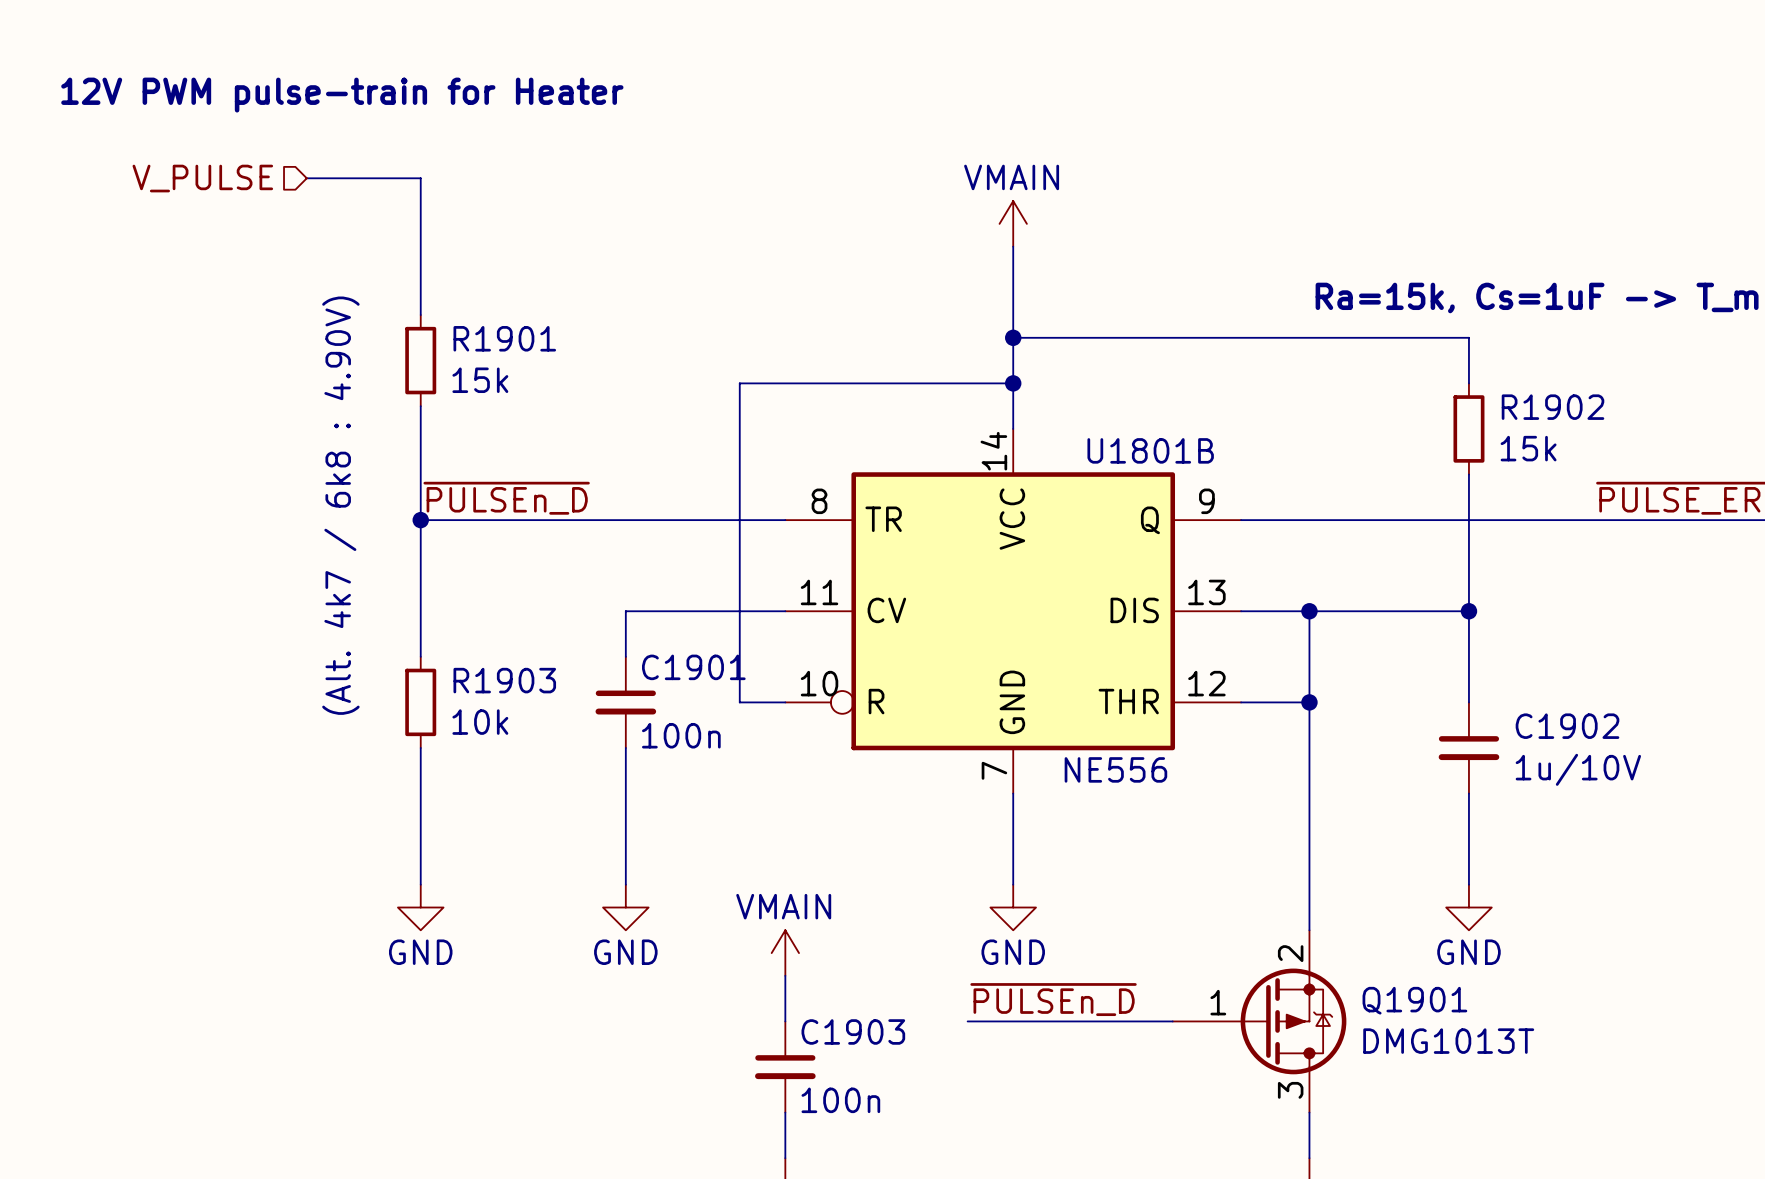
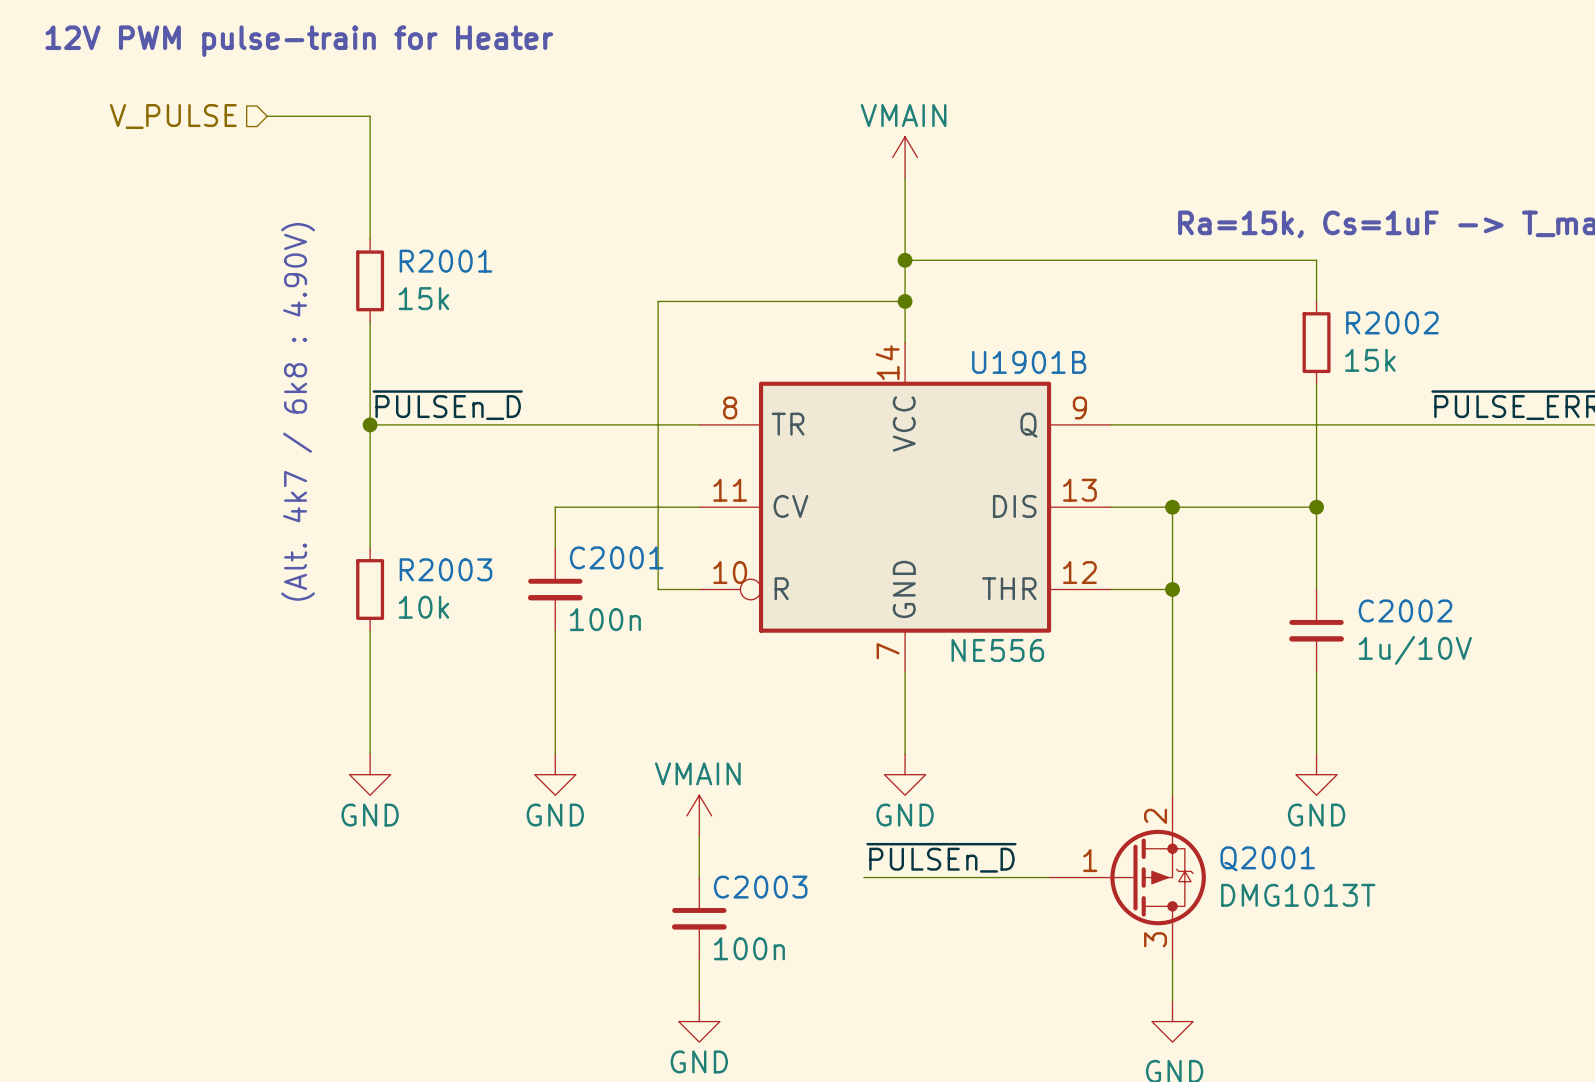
R1901 name: R1901 (504, 338) -> R2001 (445, 261)
R1902 name: R1902 (1553, 407) -> R2002 (1392, 322)
U1801B name: U1801B (1150, 450) -> U1901B (1029, 362)
C1901 name: C1901 (693, 667) -> C2001 (616, 557)
R1903 name: R1903 (504, 680) -> R2003 (445, 569)
C1902 name: C1902 (1567, 726) -> C2002 (1405, 610)
Q1901 name: Q1901 (1414, 1000) -> Q2001 (1267, 858)
C1903 name: C1903 (853, 1031) -> C2003 (760, 887)

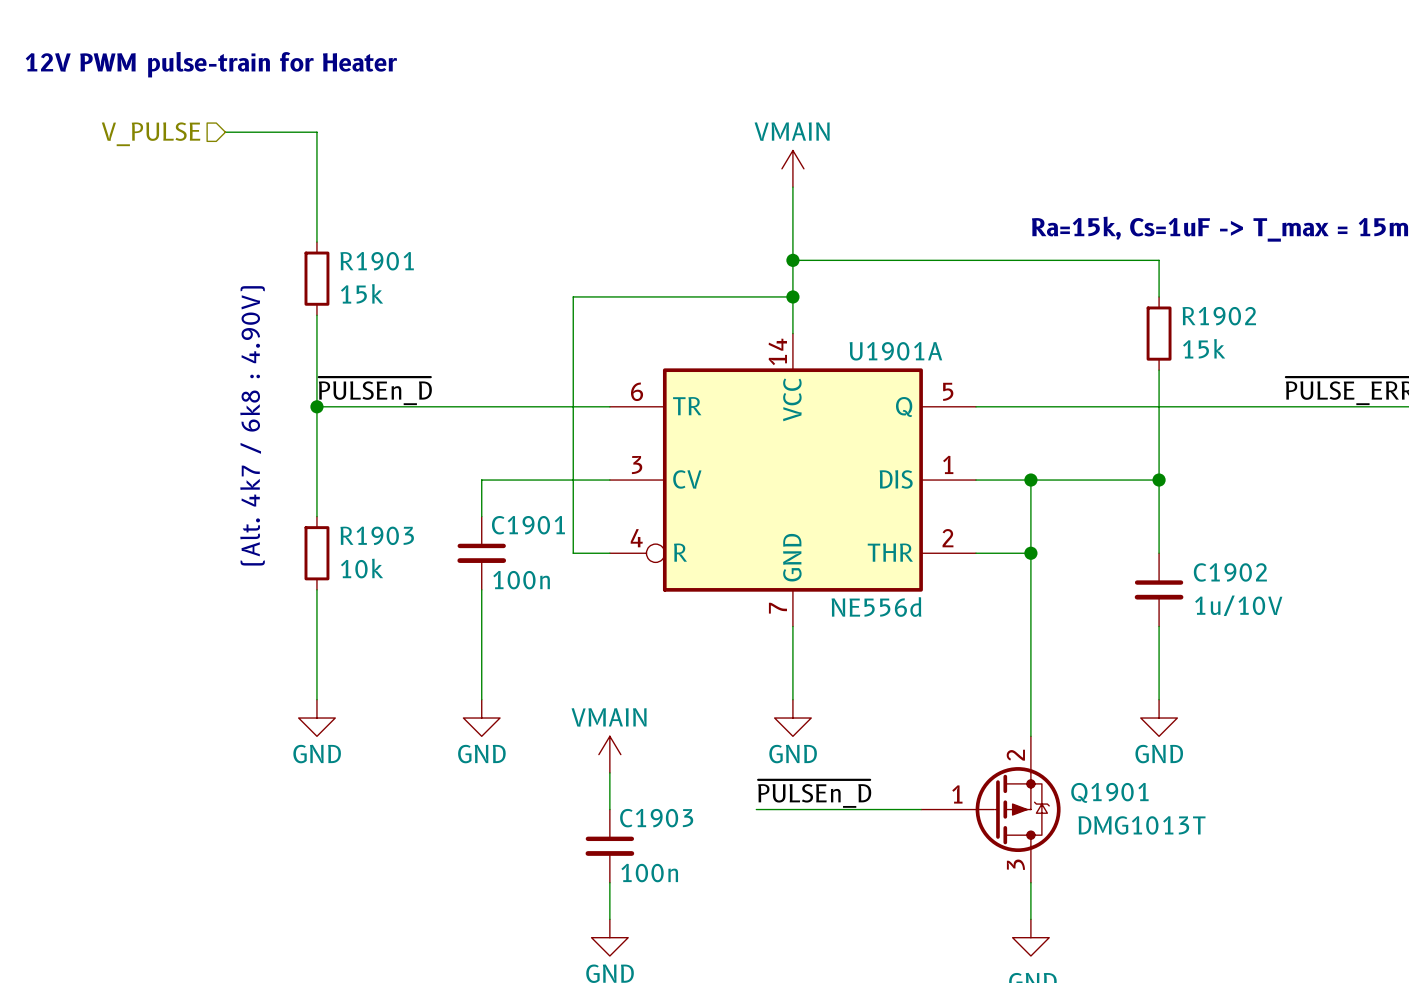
R2001 name: R2001 (445, 261) -> R1901 (377, 261)
R2002 name: R2002 (1392, 322) -> R1902 (1219, 316)
U1901B name: U1901B (1029, 362) -> U1901A (895, 351)
U1901B pin number: 8 (730, 407) -> 6 (637, 391)
U1901B pin number: 9 (1079, 407) -> 5 (948, 391)
U1901B pin number: 11 (730, 490) -> 3 (637, 465)
U1901B pin number: 13 (1079, 490) -> 1 (948, 464)
C2001 name: C2001 (616, 557) -> C1901 (528, 525)
R2003 name: R2003 (445, 569) -> R1903 (377, 535)
U1901B pin number: 10 (730, 572) -> 4 (636, 538)
U1901B pin number: 12 (1079, 572) -> 2 (947, 538)
C2002 name: C2002 (1405, 610) -> C1902 (1230, 572)
U1901B value: NE556 (997, 650) -> NE556d (876, 606)
Q2001 name: Q2001 (1267, 858) -> Q1901 (1109, 792)
C2003 name: C2003 (760, 887) -> C1903 (656, 818)

